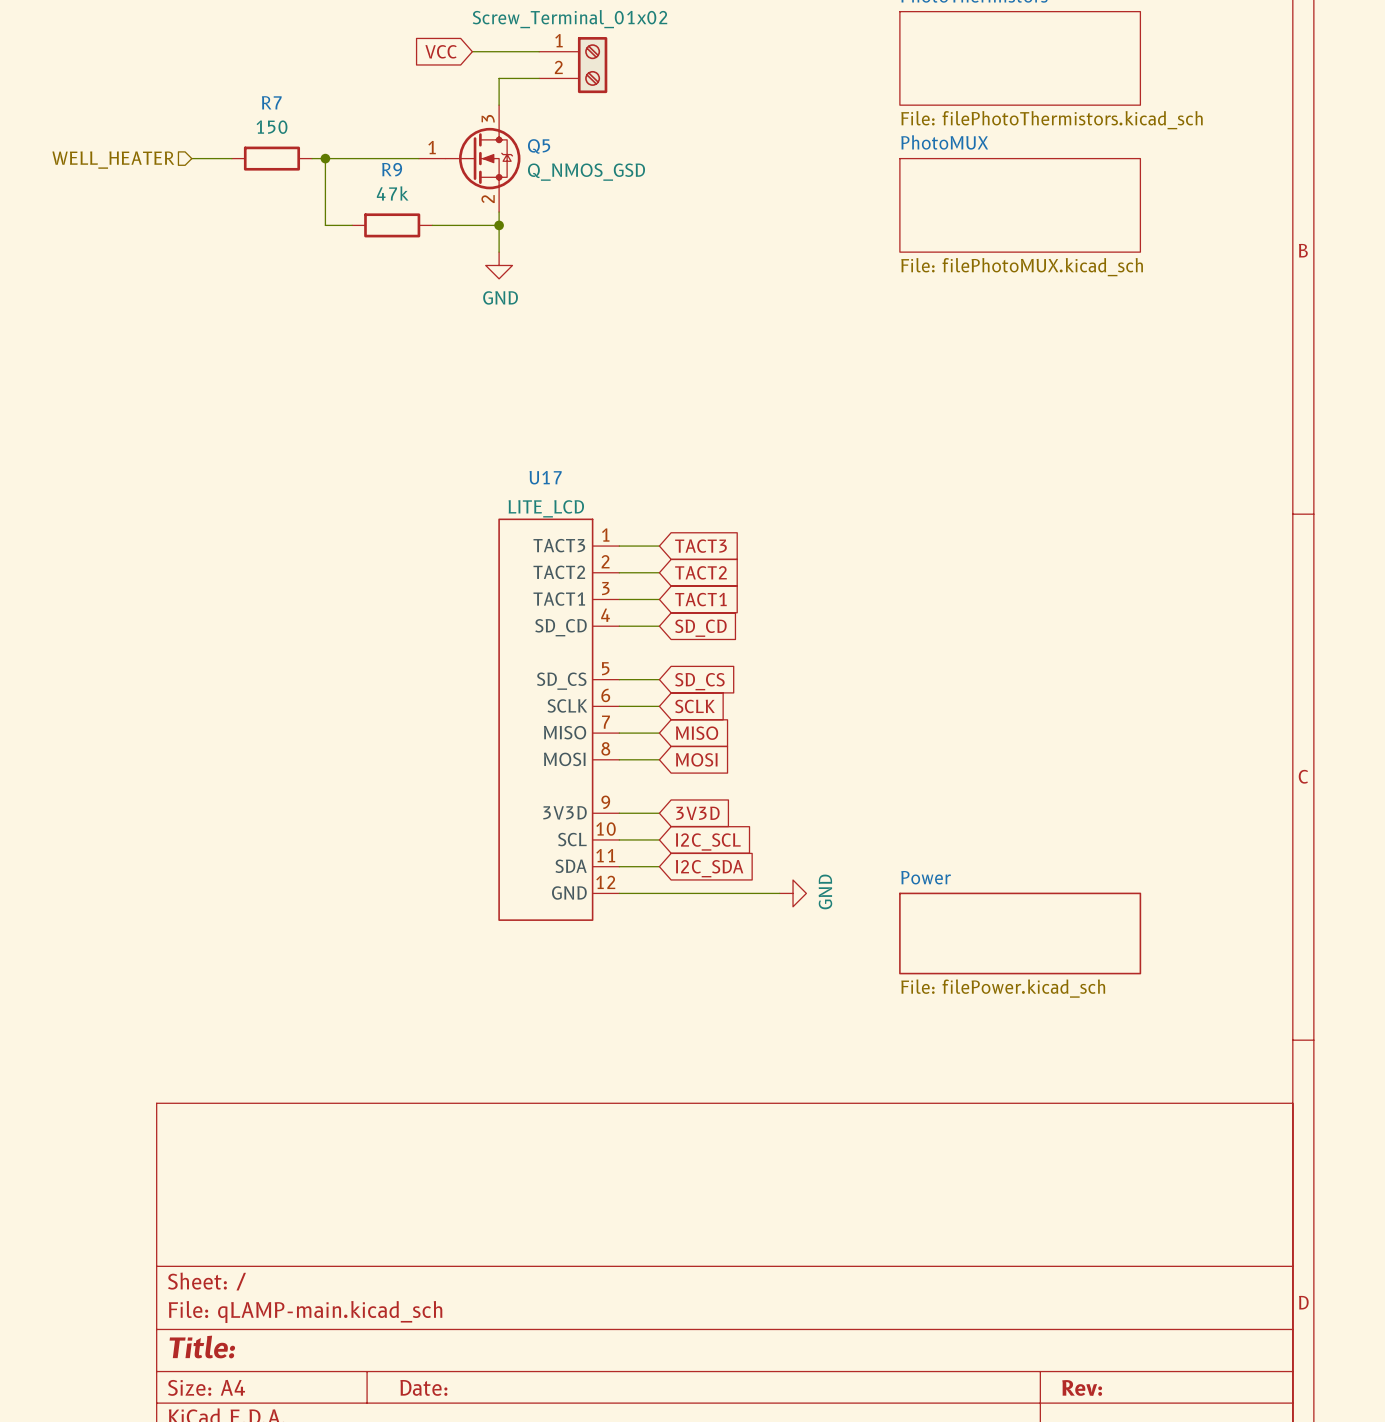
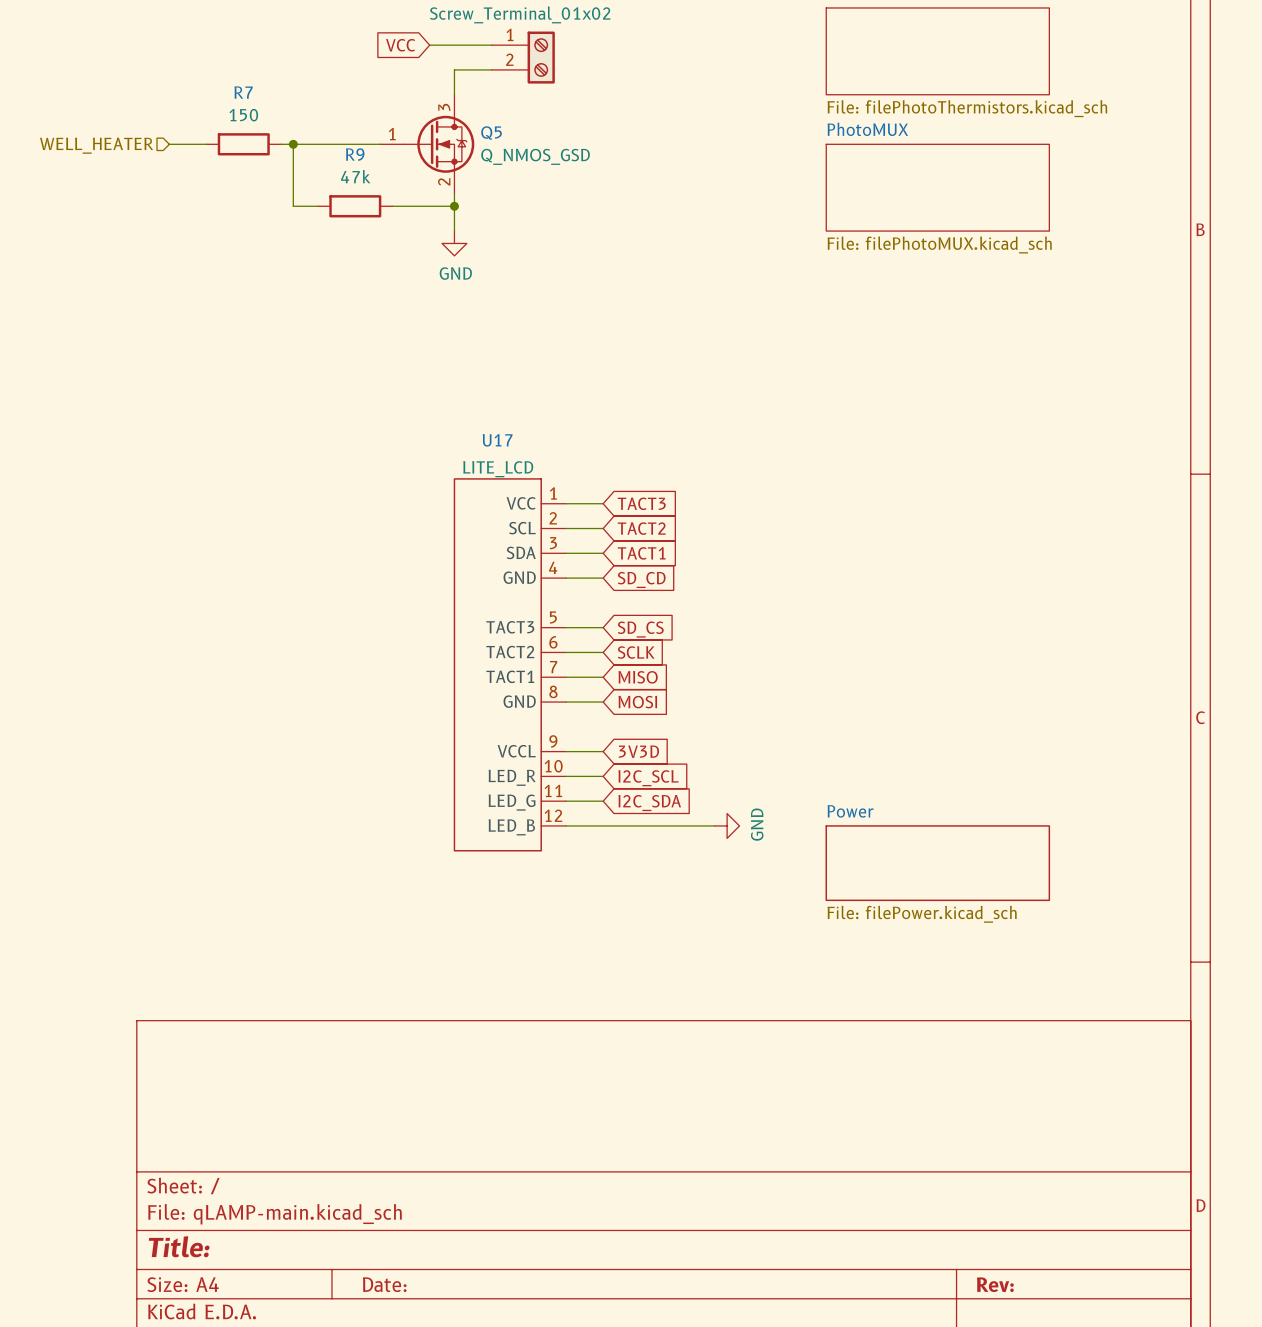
U17 symbol: [498, 518, 620, 921] -> [453, 478, 566, 852]

